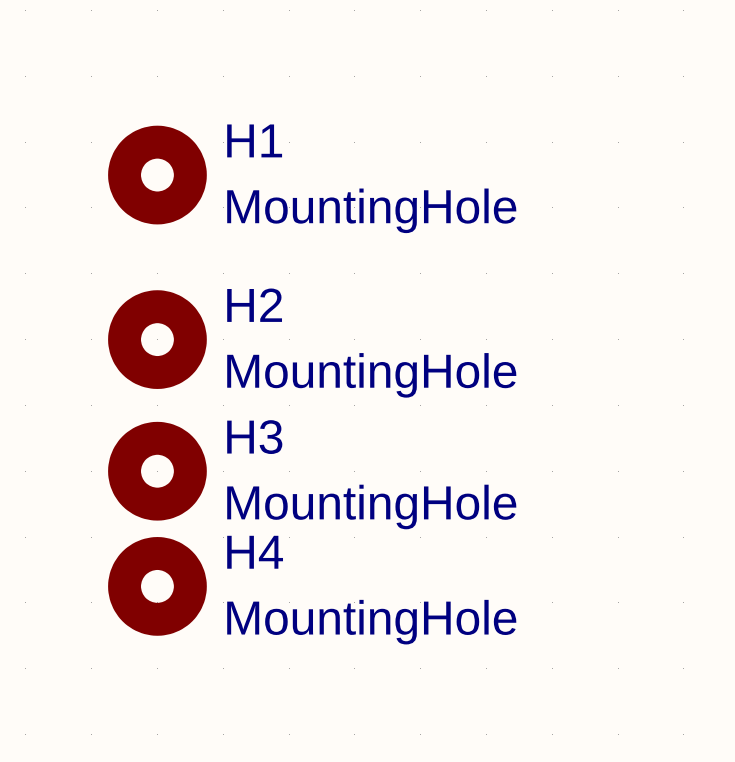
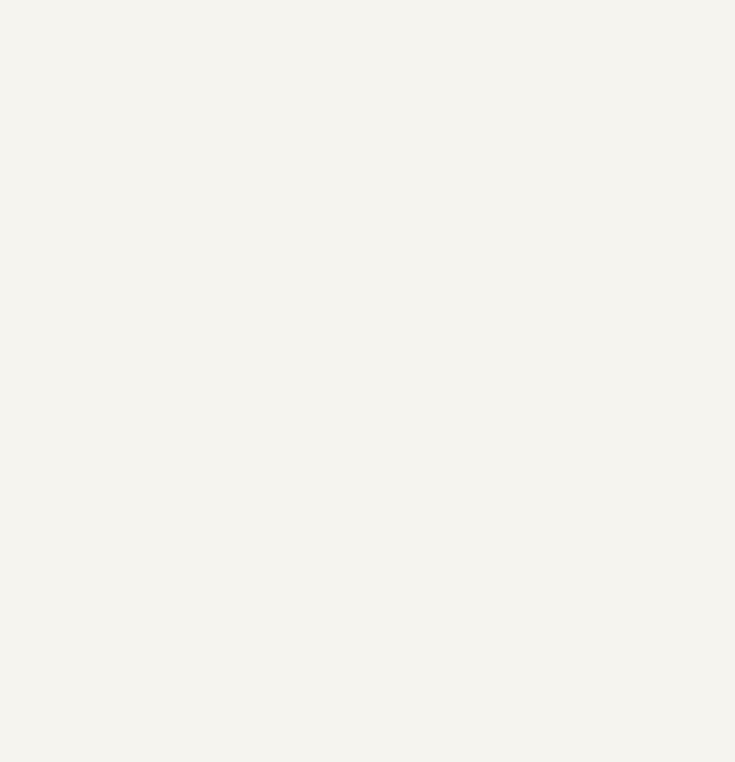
H1: MountingHole (157, 175) -> none
H2: MountingHole (157, 339) -> none
H3: MountingHole (157, 471) -> none
H4: MountingHole (157, 586) -> none

